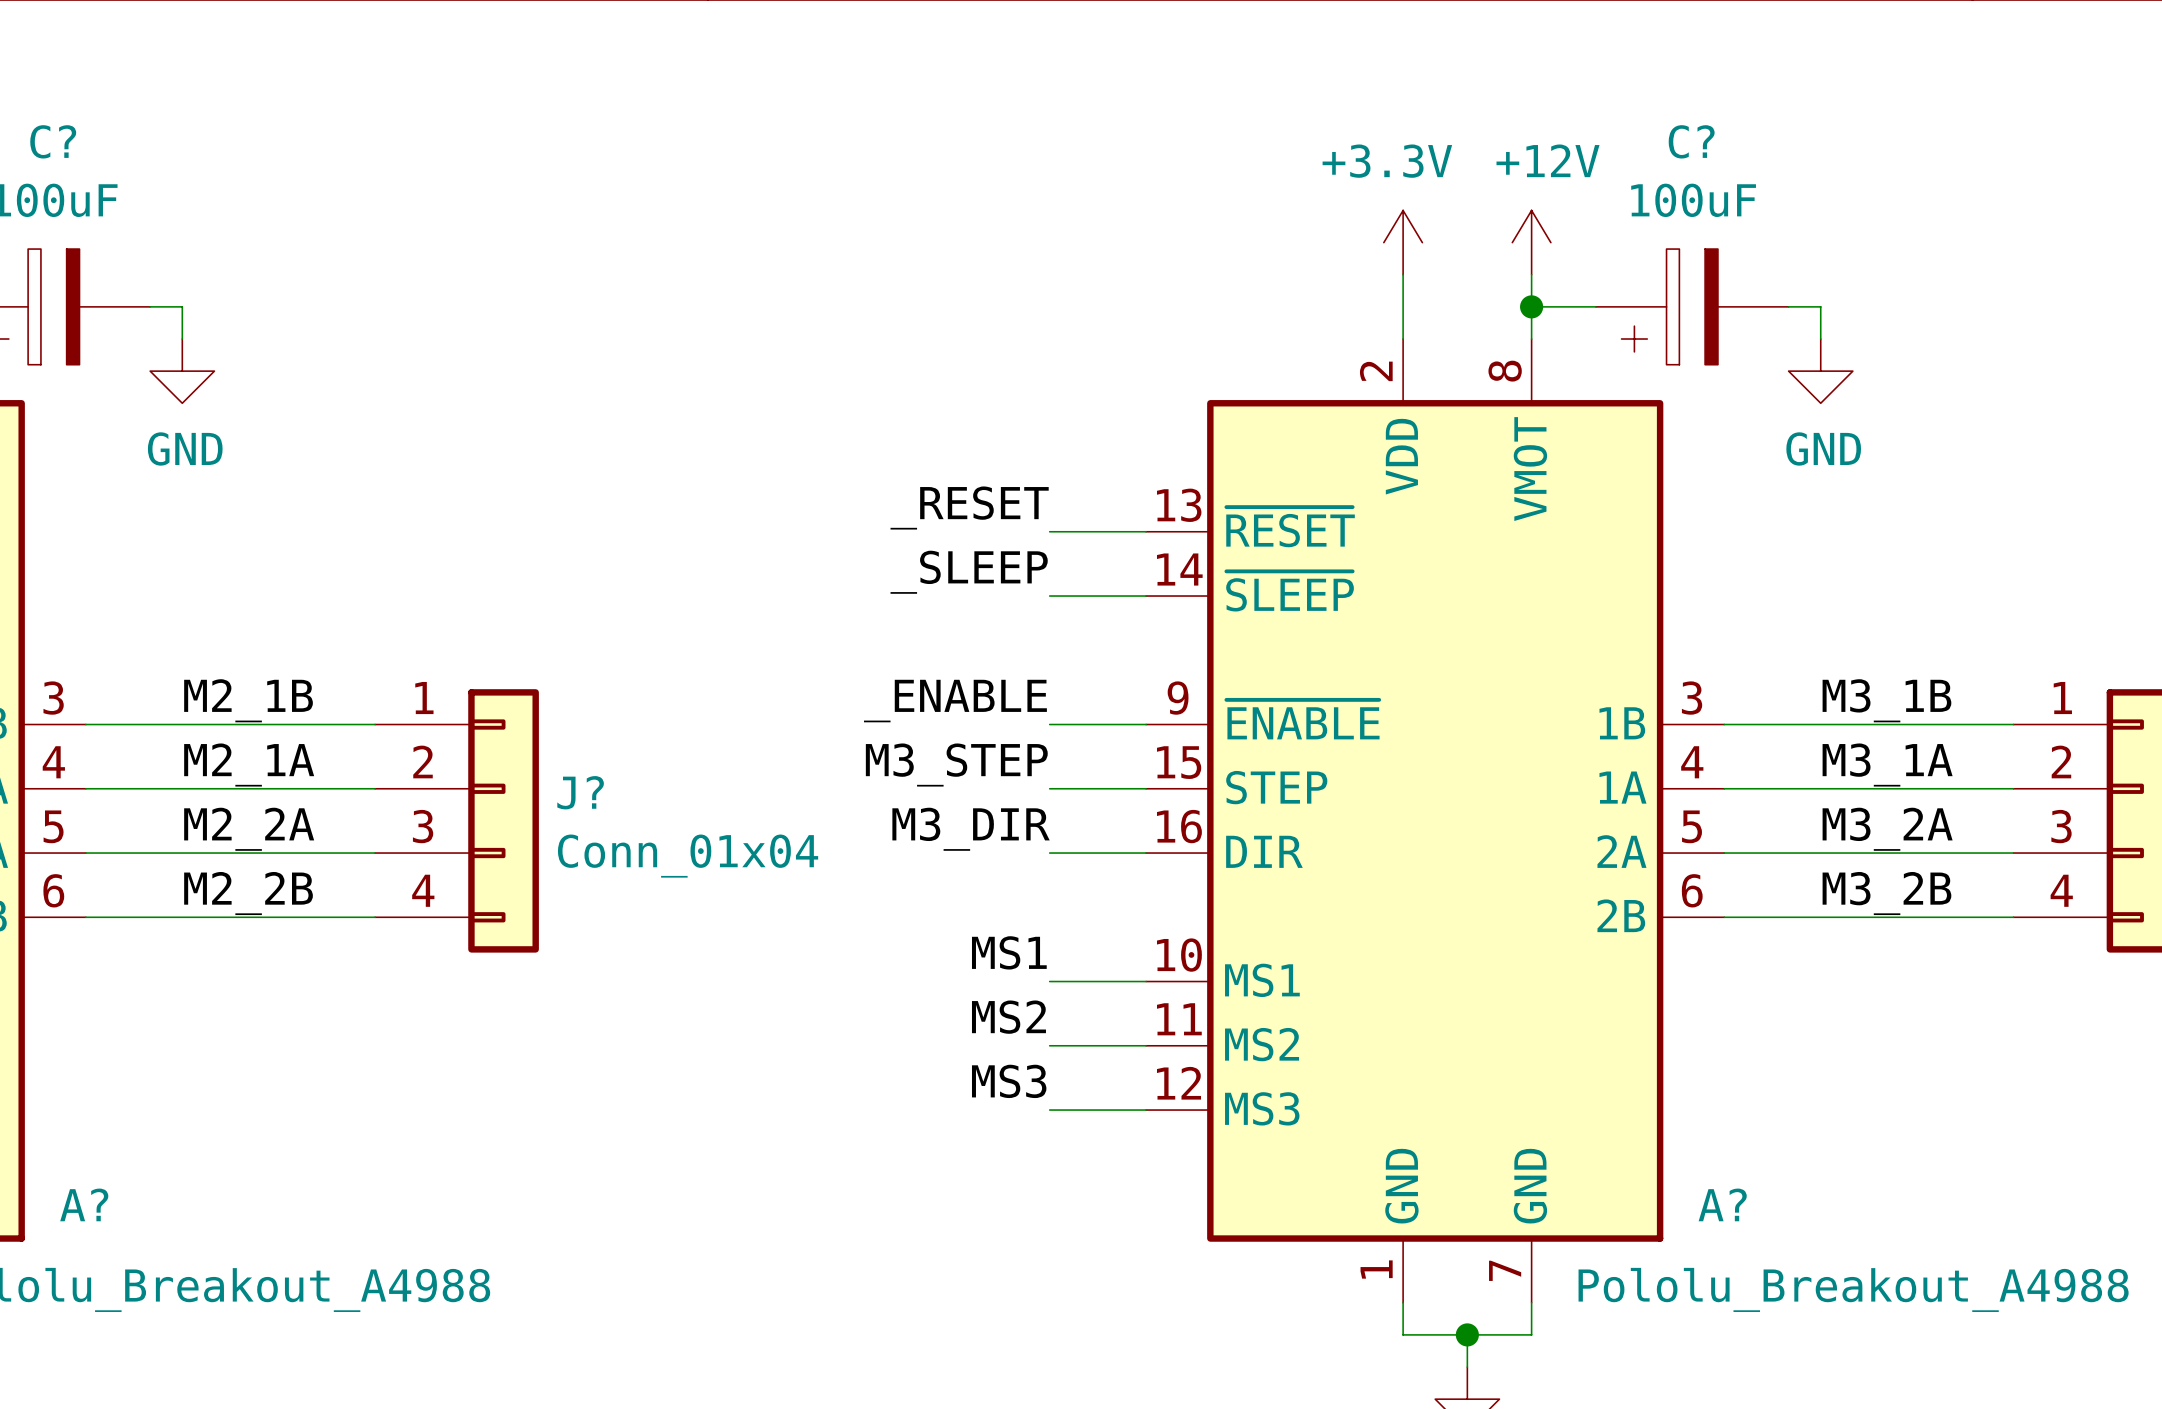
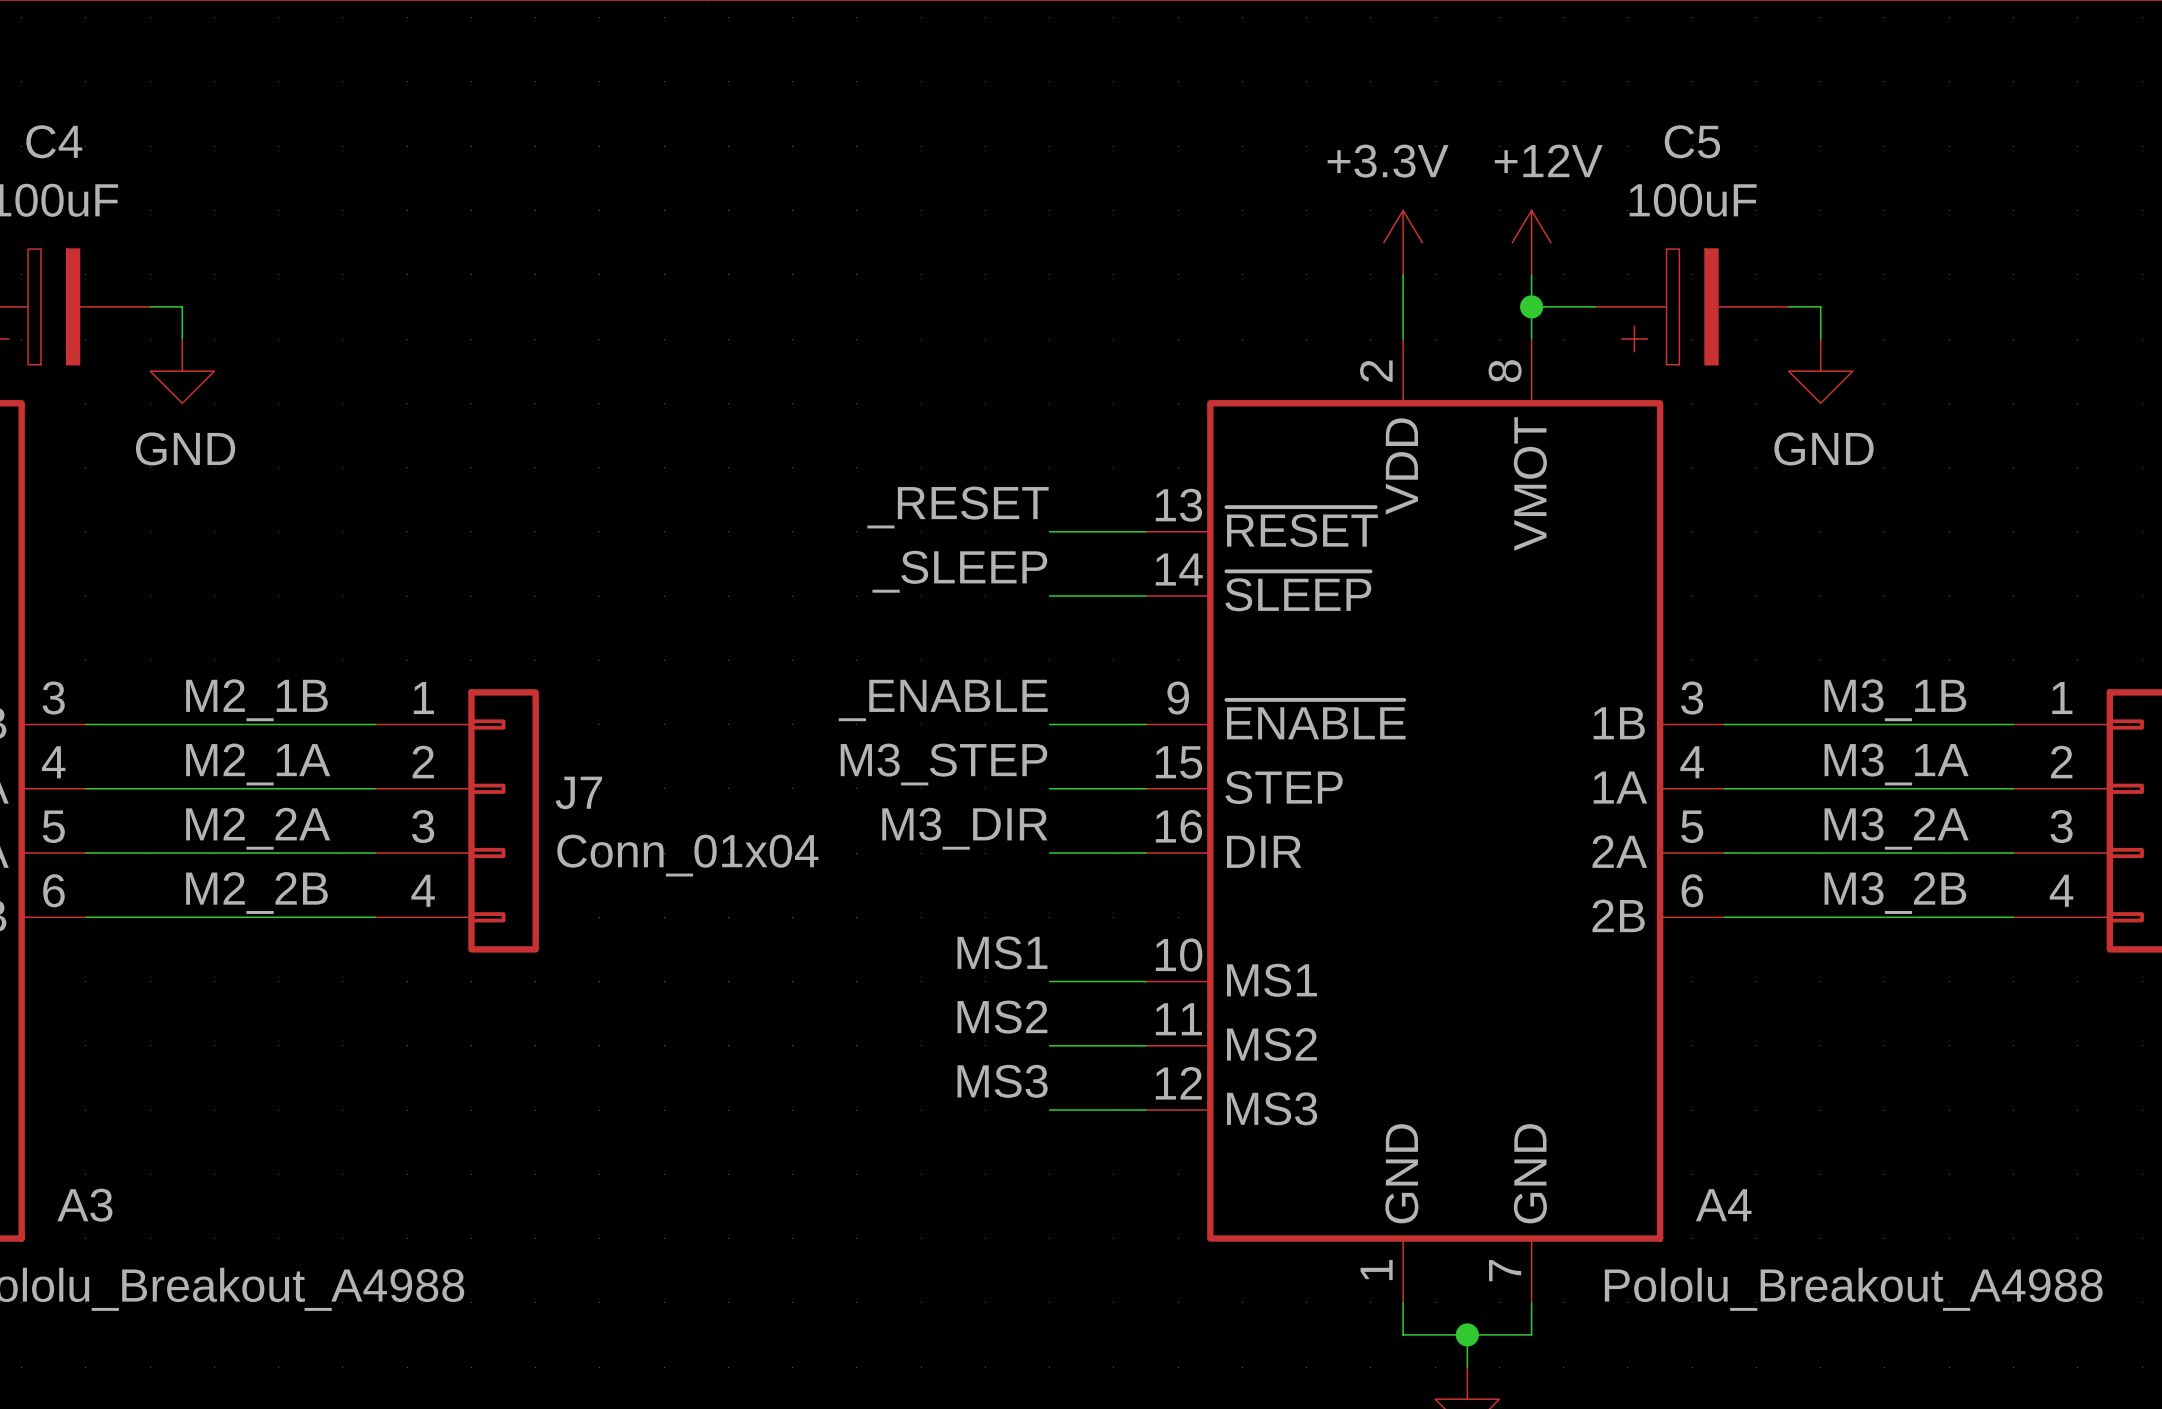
C? name: C? (53, 141) -> C4 (54, 141)
C? name: C? (1691, 141) -> C5 (1692, 141)
J? name: J? (580, 792) -> J7 (578, 792)
A? name: A? (84, 1204) -> A3 (84, 1205)
A? name: A? (1722, 1204) -> A4 (1723, 1205)

